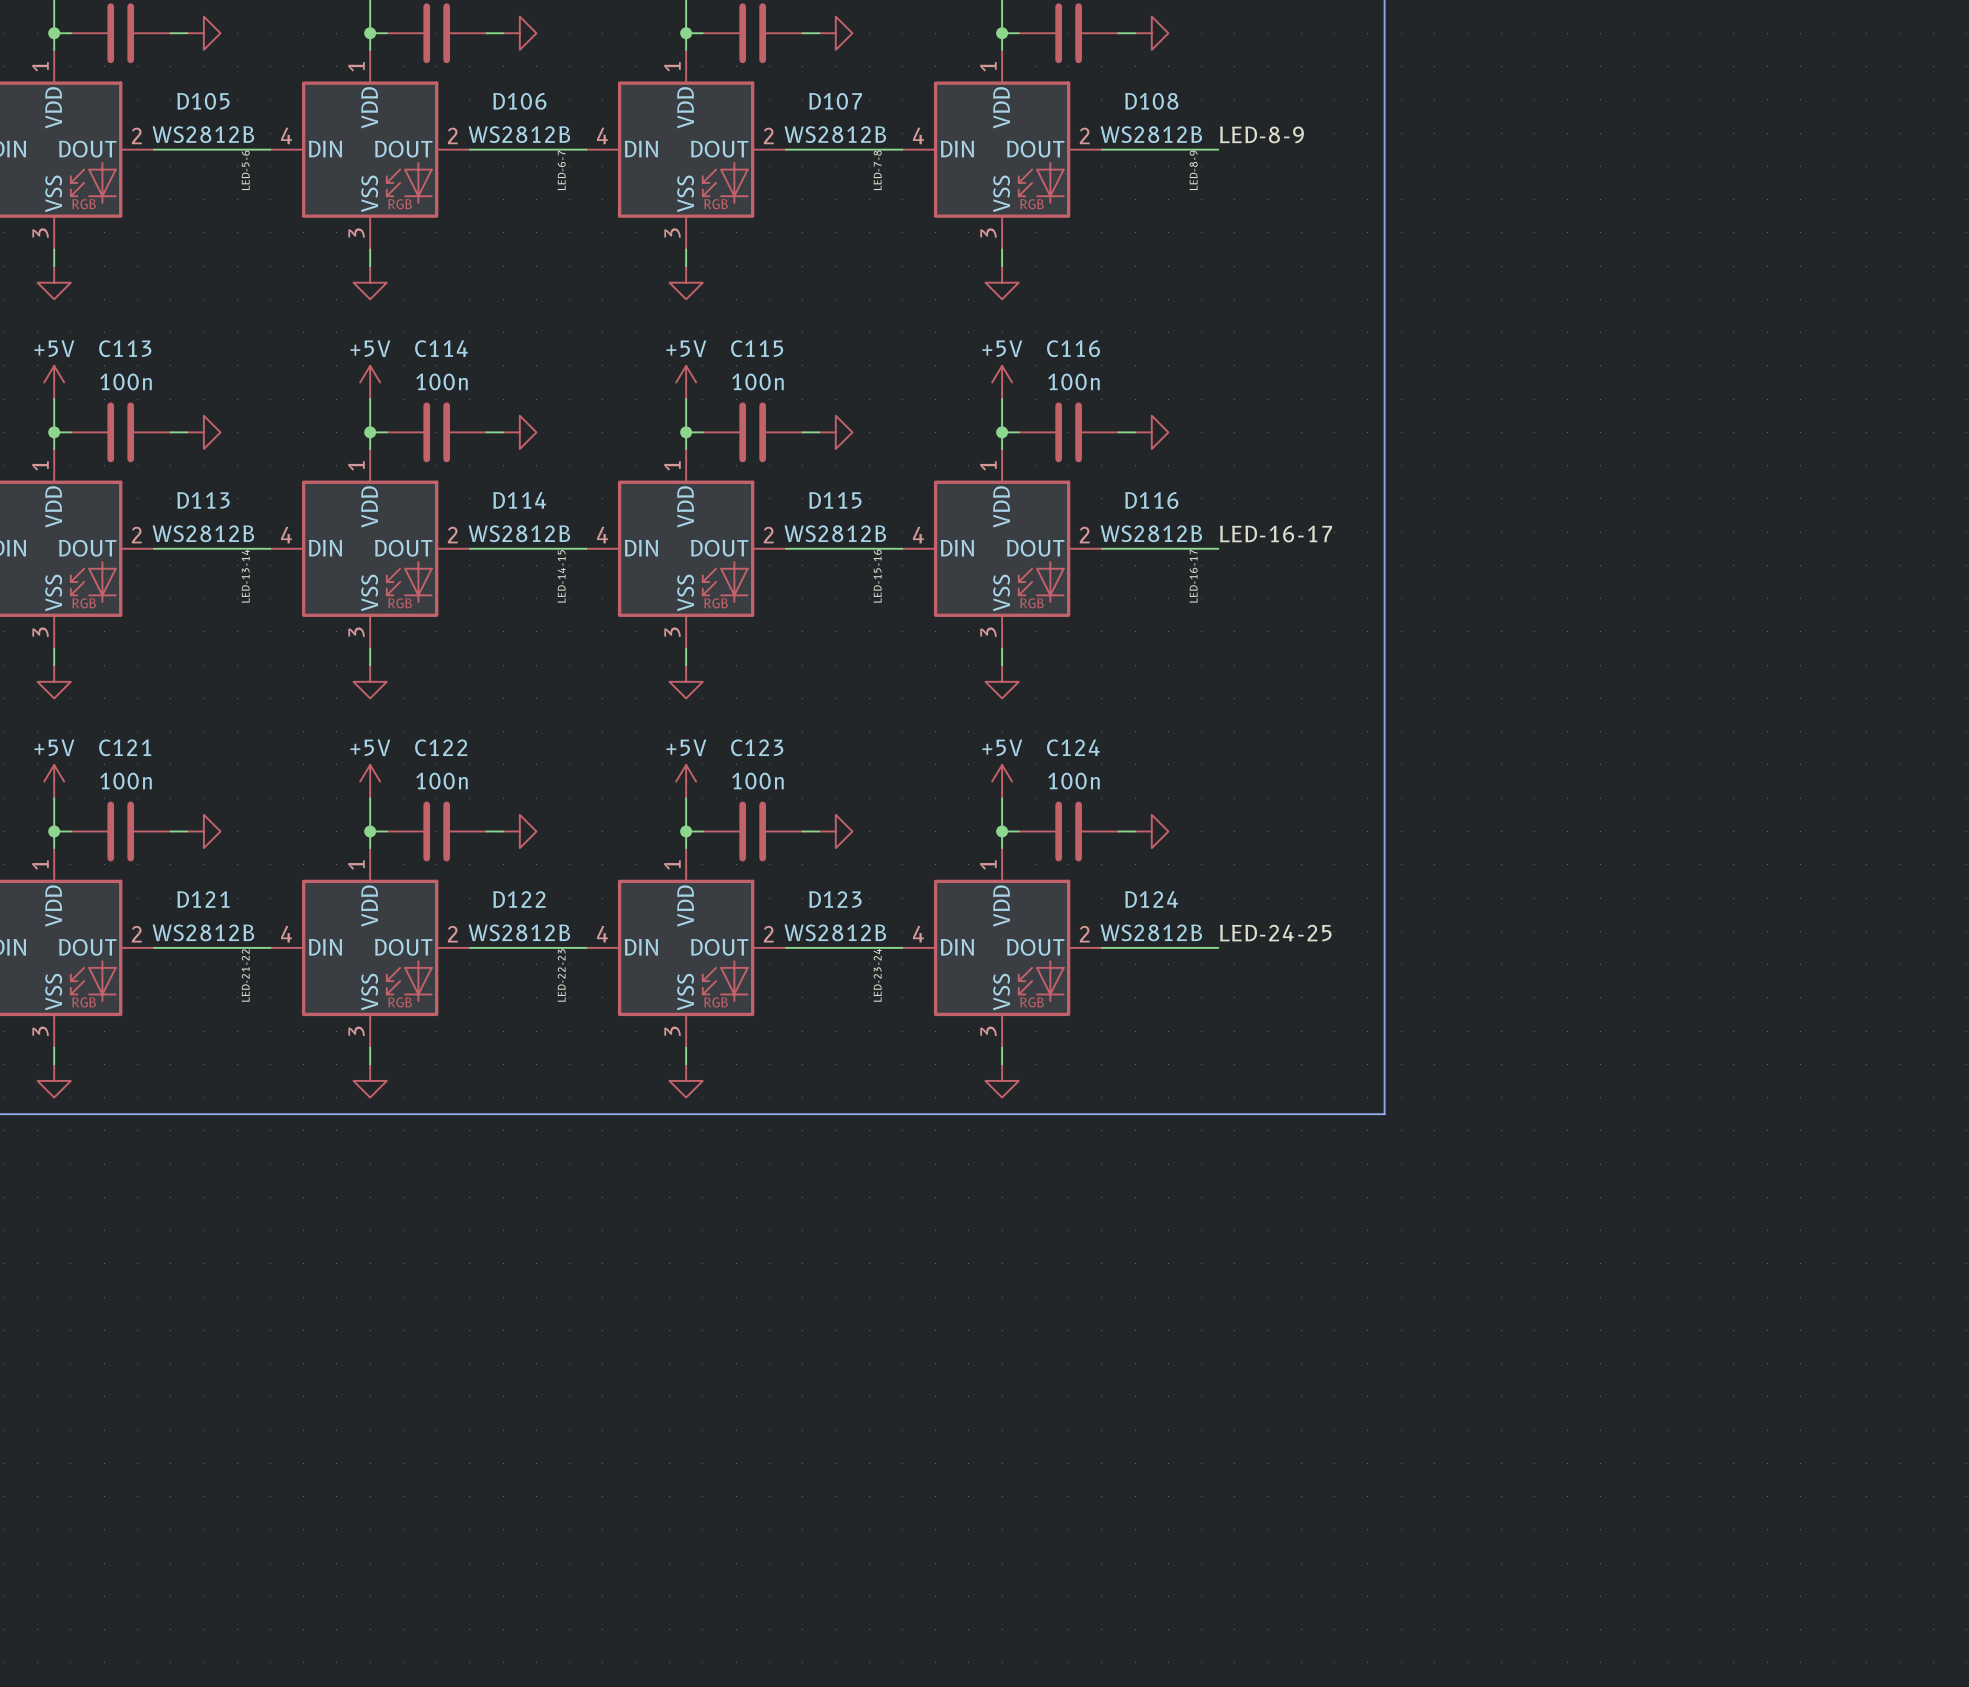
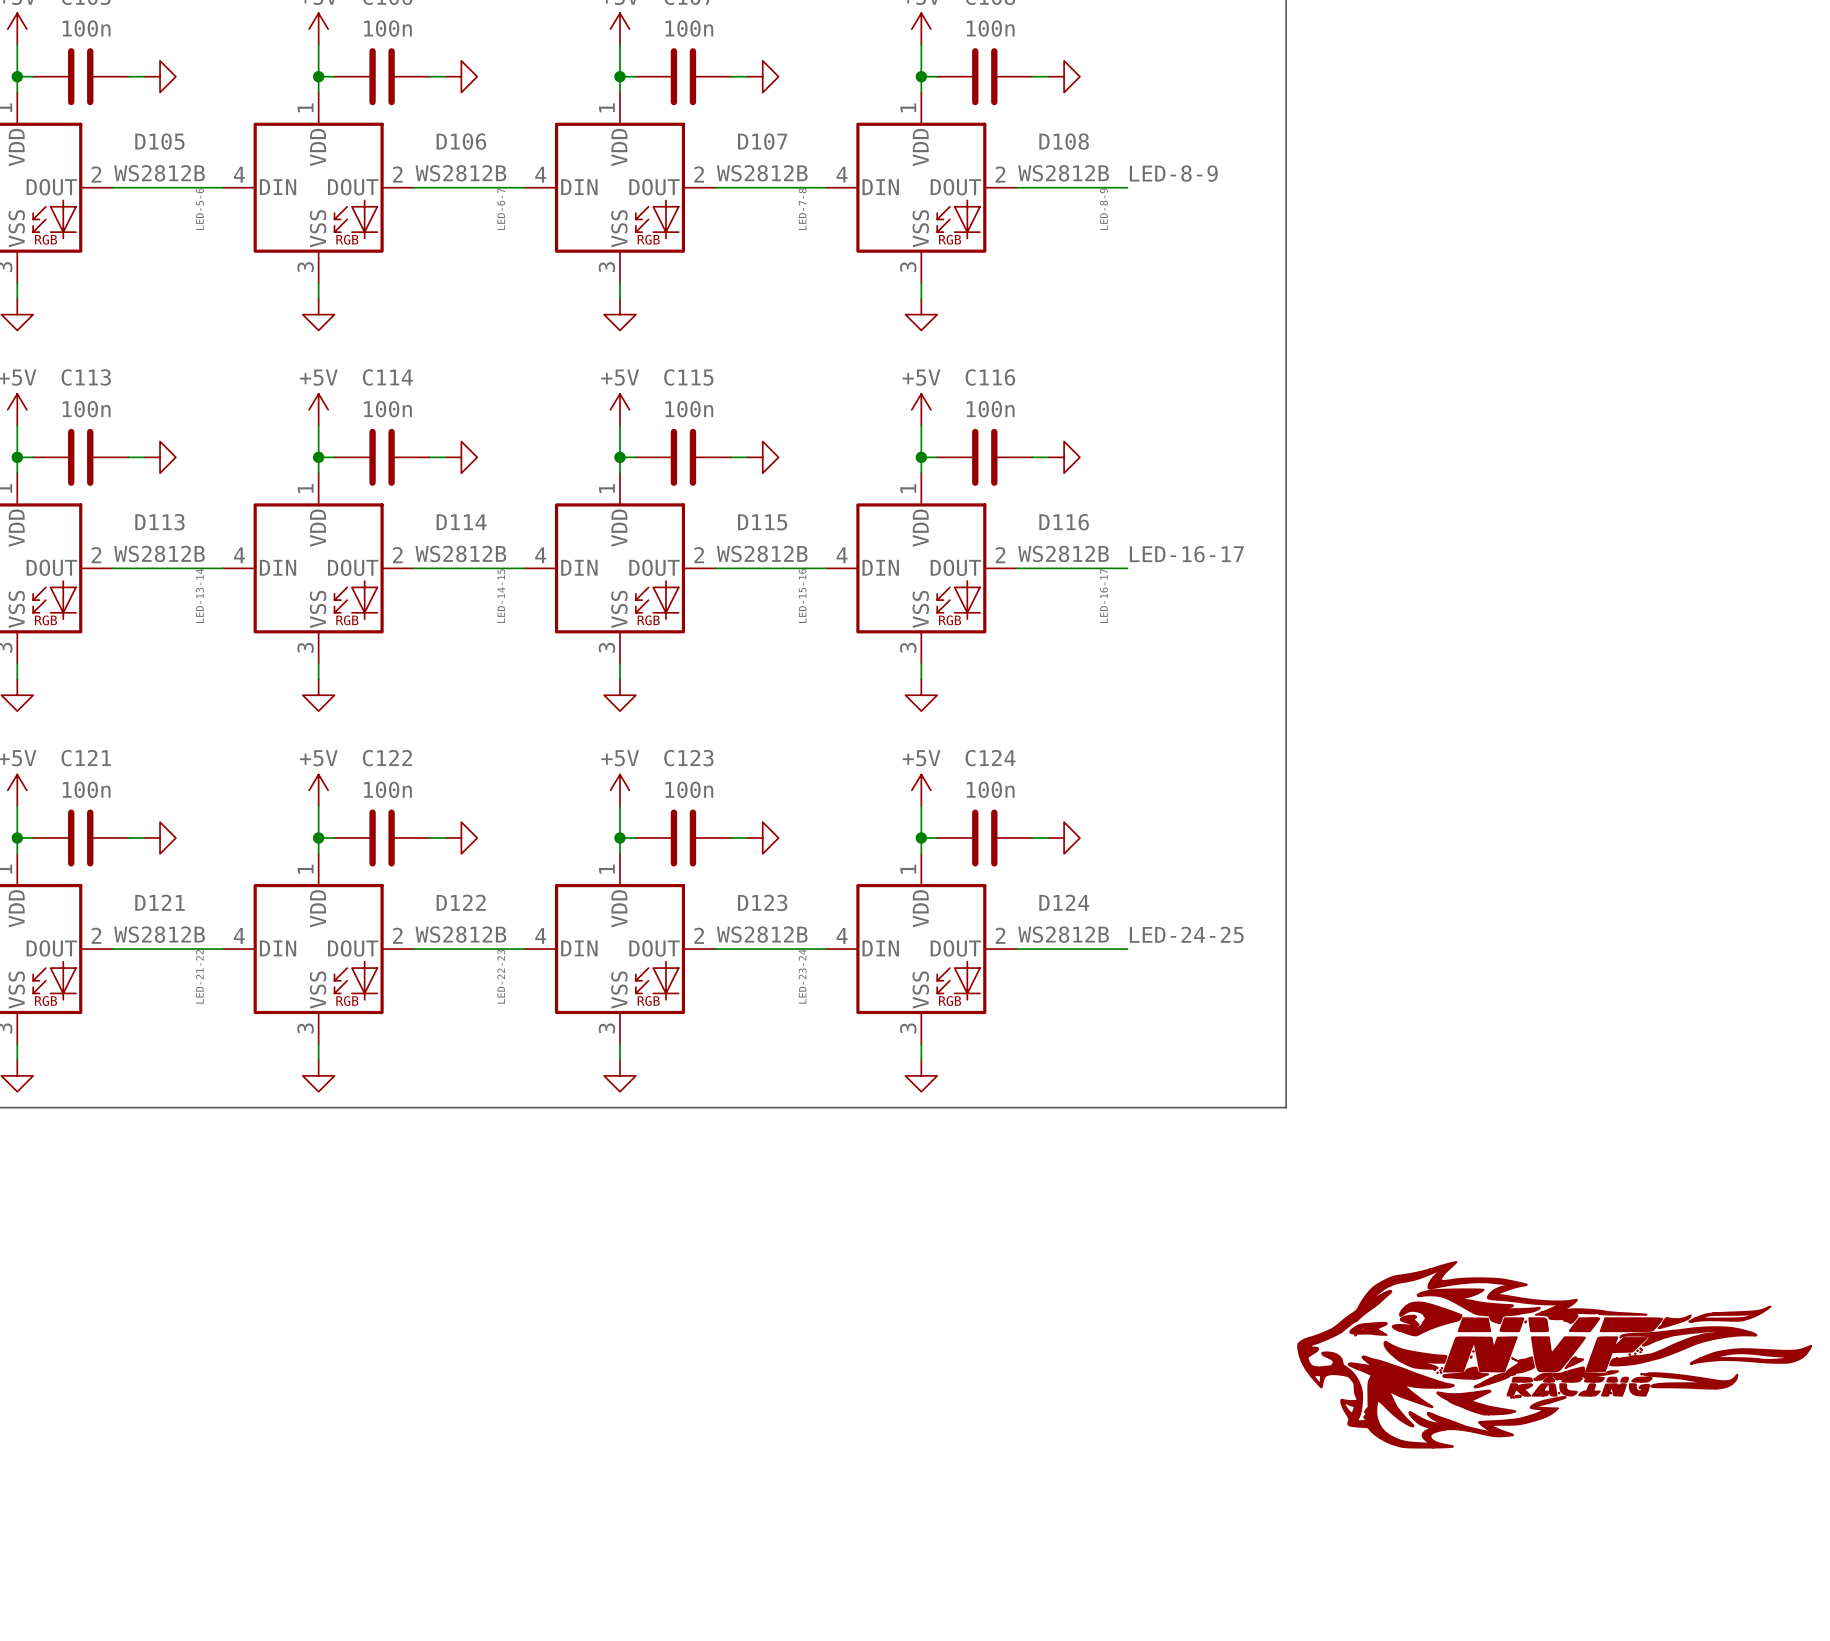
power symbol: none -> (1554, 1354)

